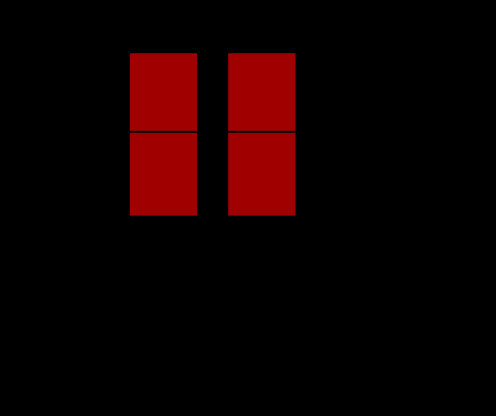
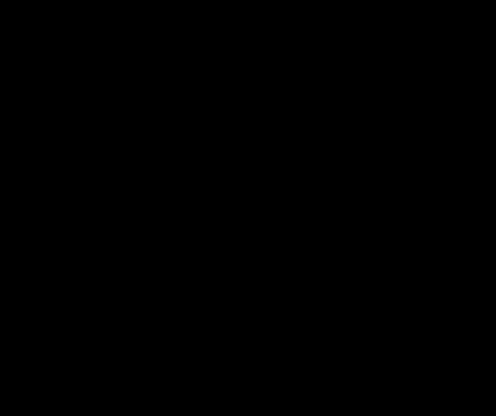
part: (212, 92) -> none
part: (212, 174) -> none

